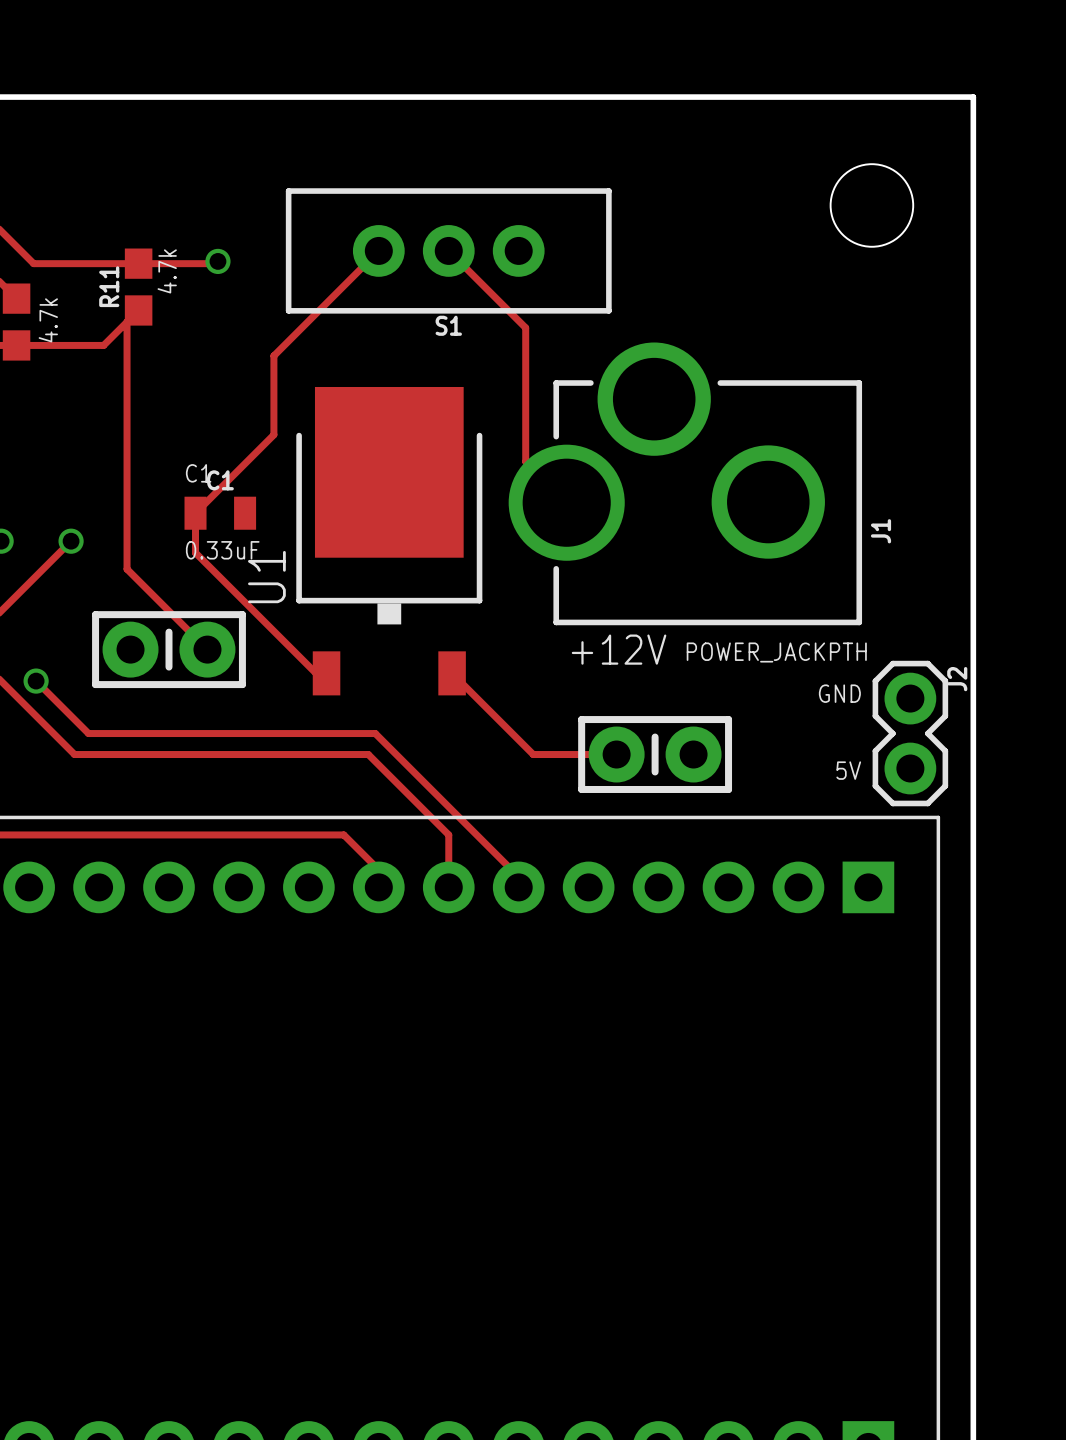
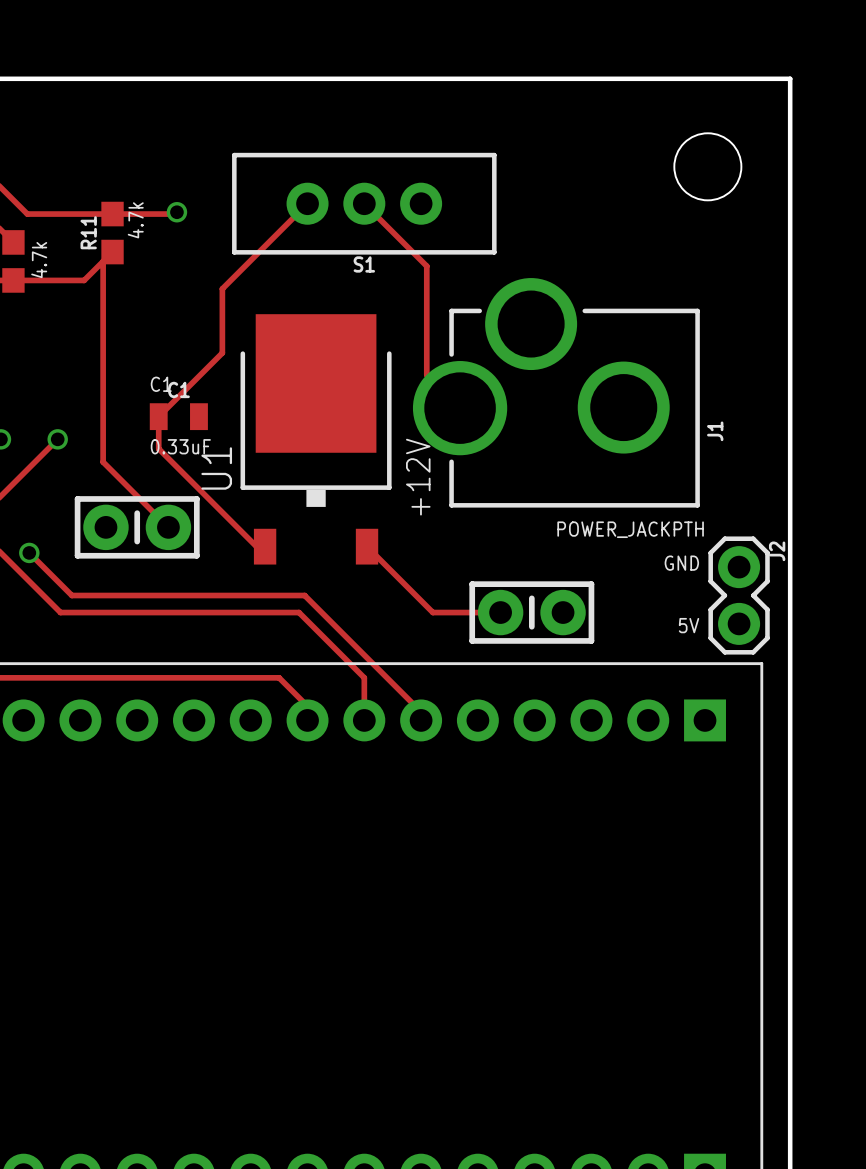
text rotation: 0° (619, 649) -> 90° counterclockwise (418, 477)

